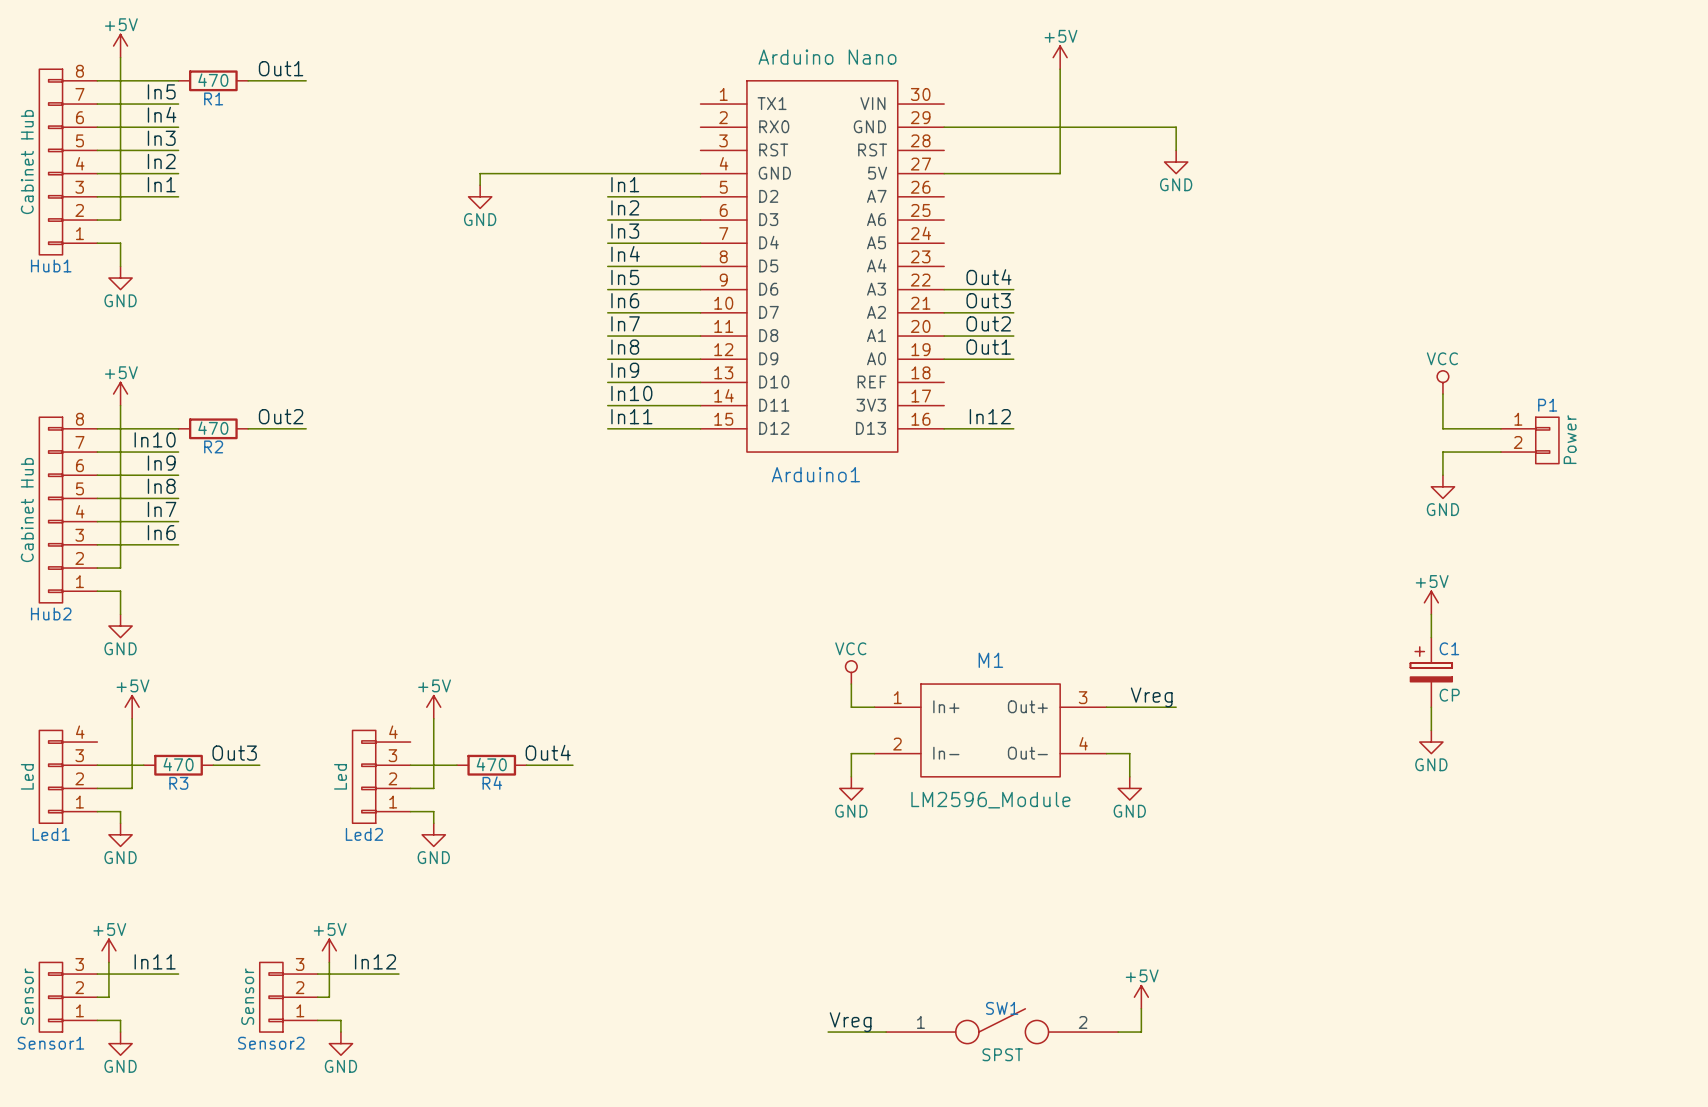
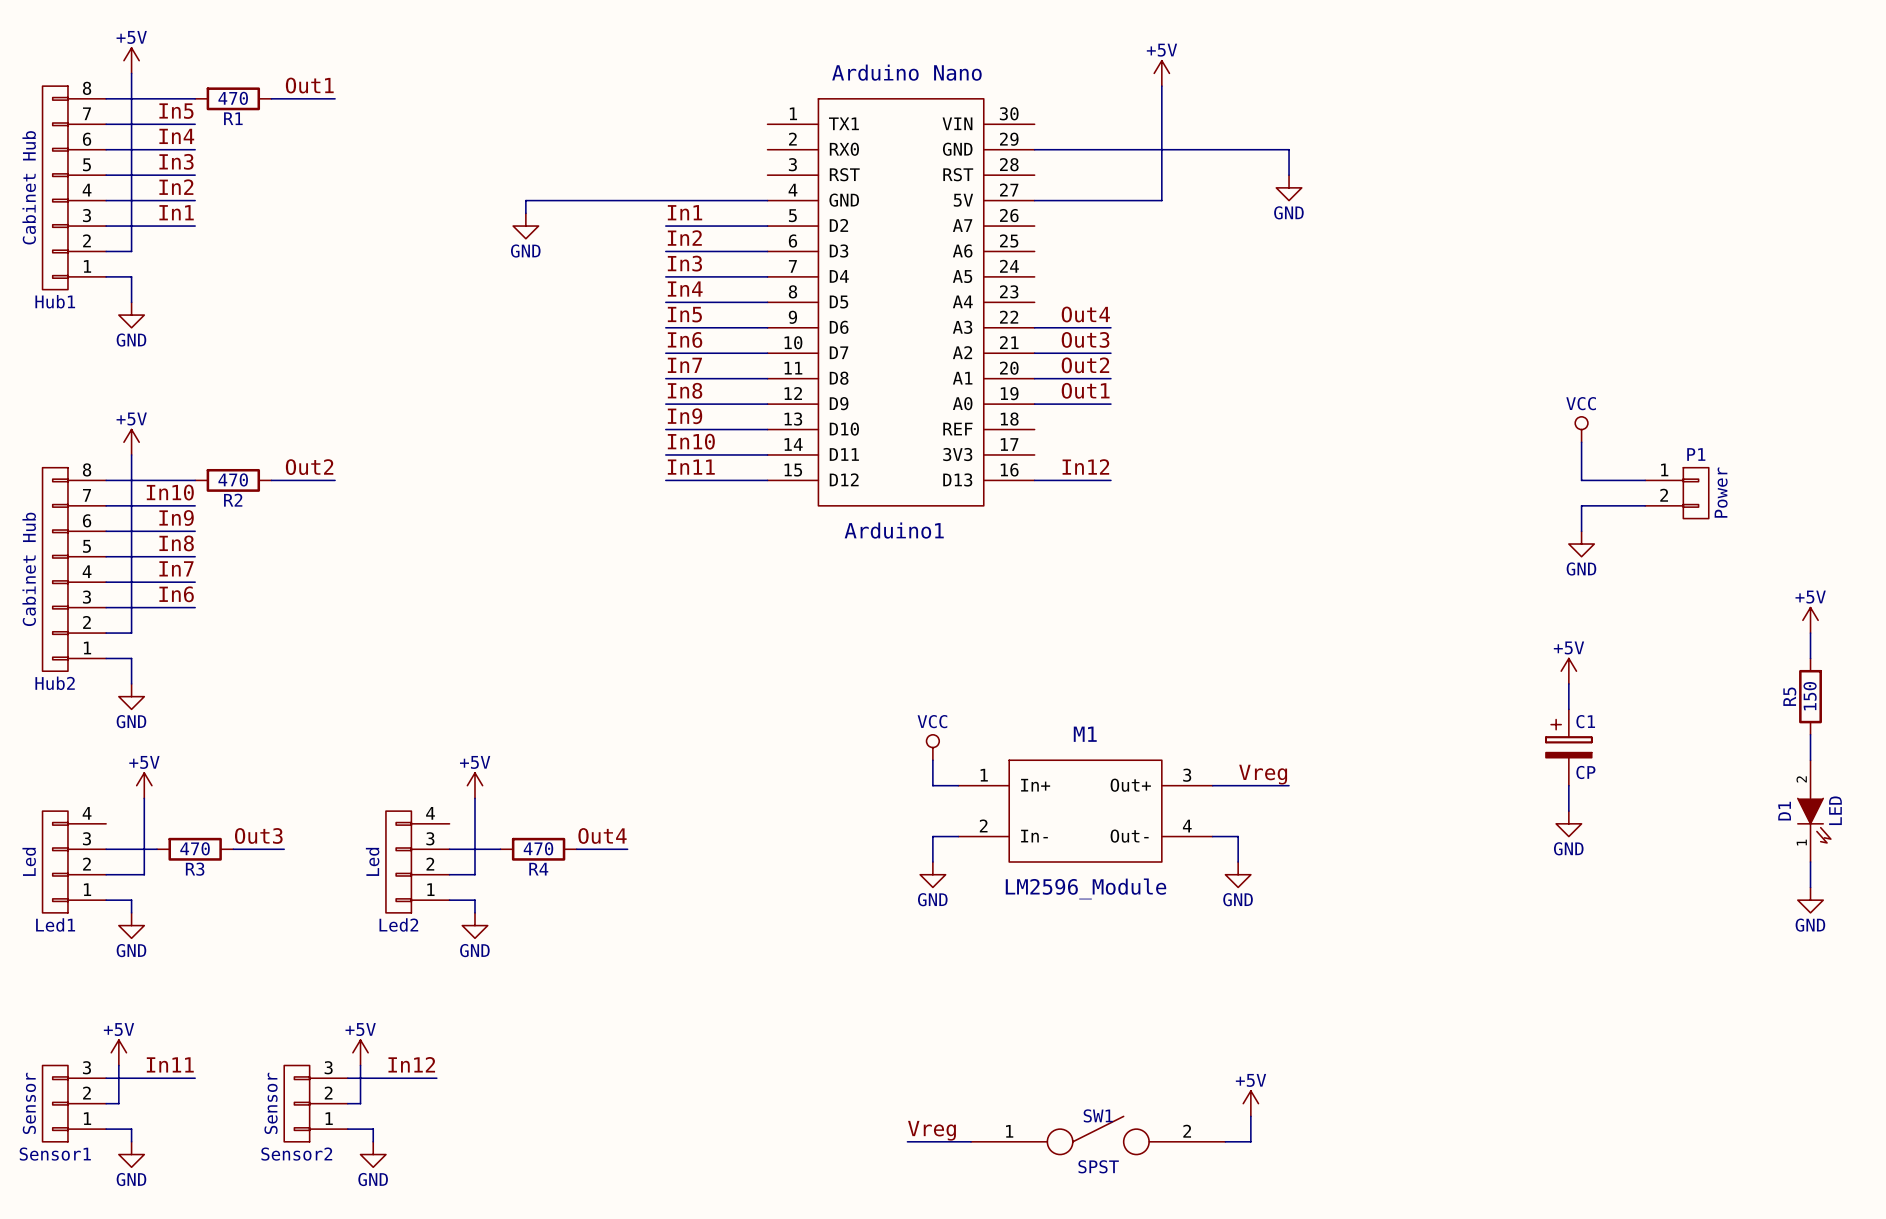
power symbol: none -> +5V (1810, 620)
wire: none -> (1810, 633) (1810, 658)
R5: none -> 150 (1810, 696)
wire: none -> (1810, 734) (1810, 760)
D1: none -> LED (1814, 811)
wire: none -> (1810, 862) (1810, 887)
power symbol: none -> GND (1810, 900)

